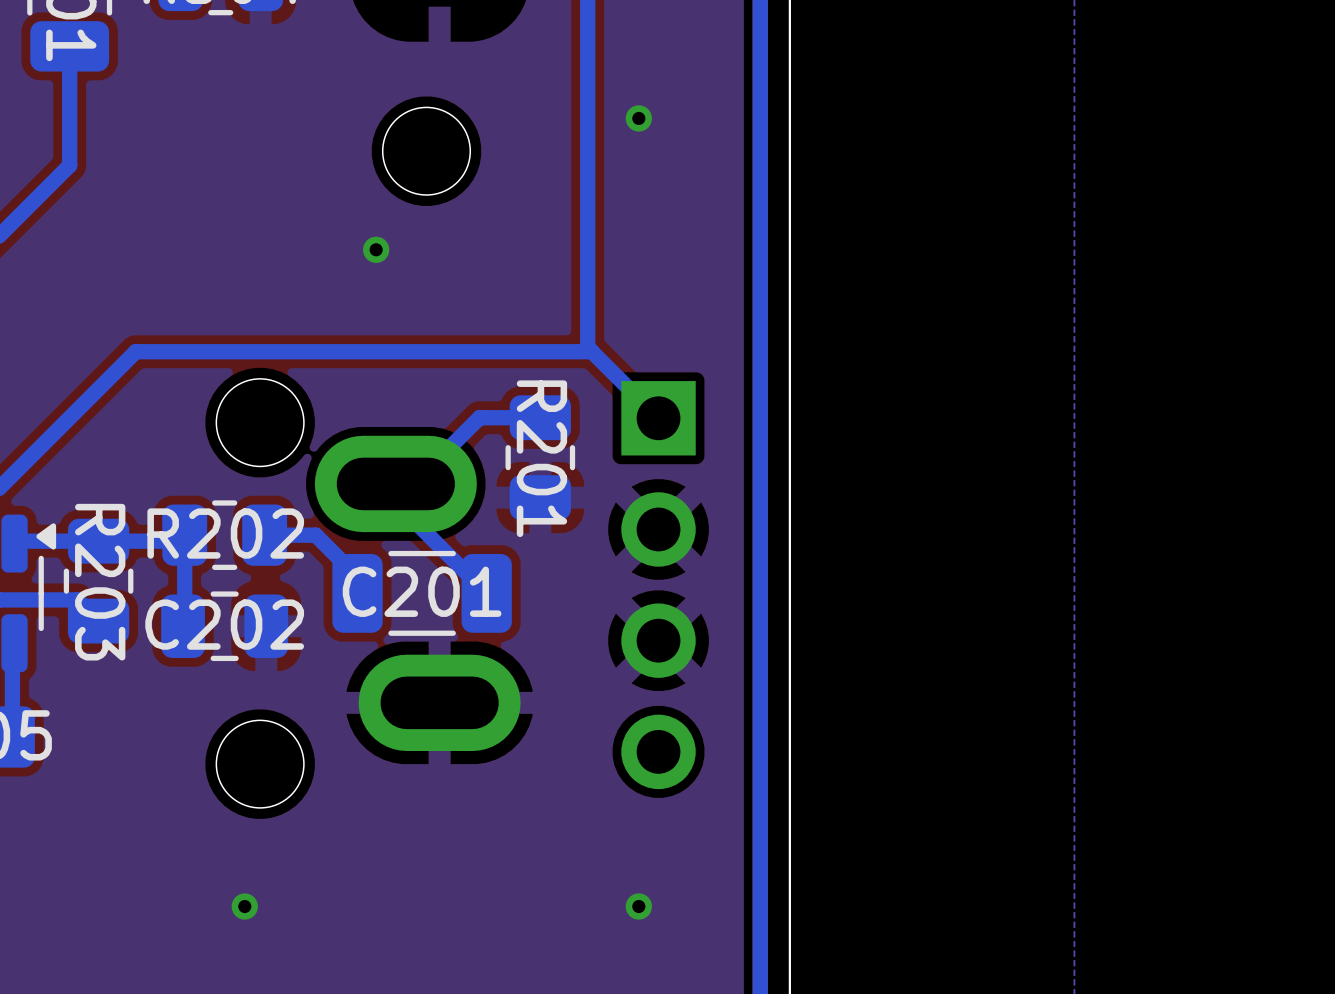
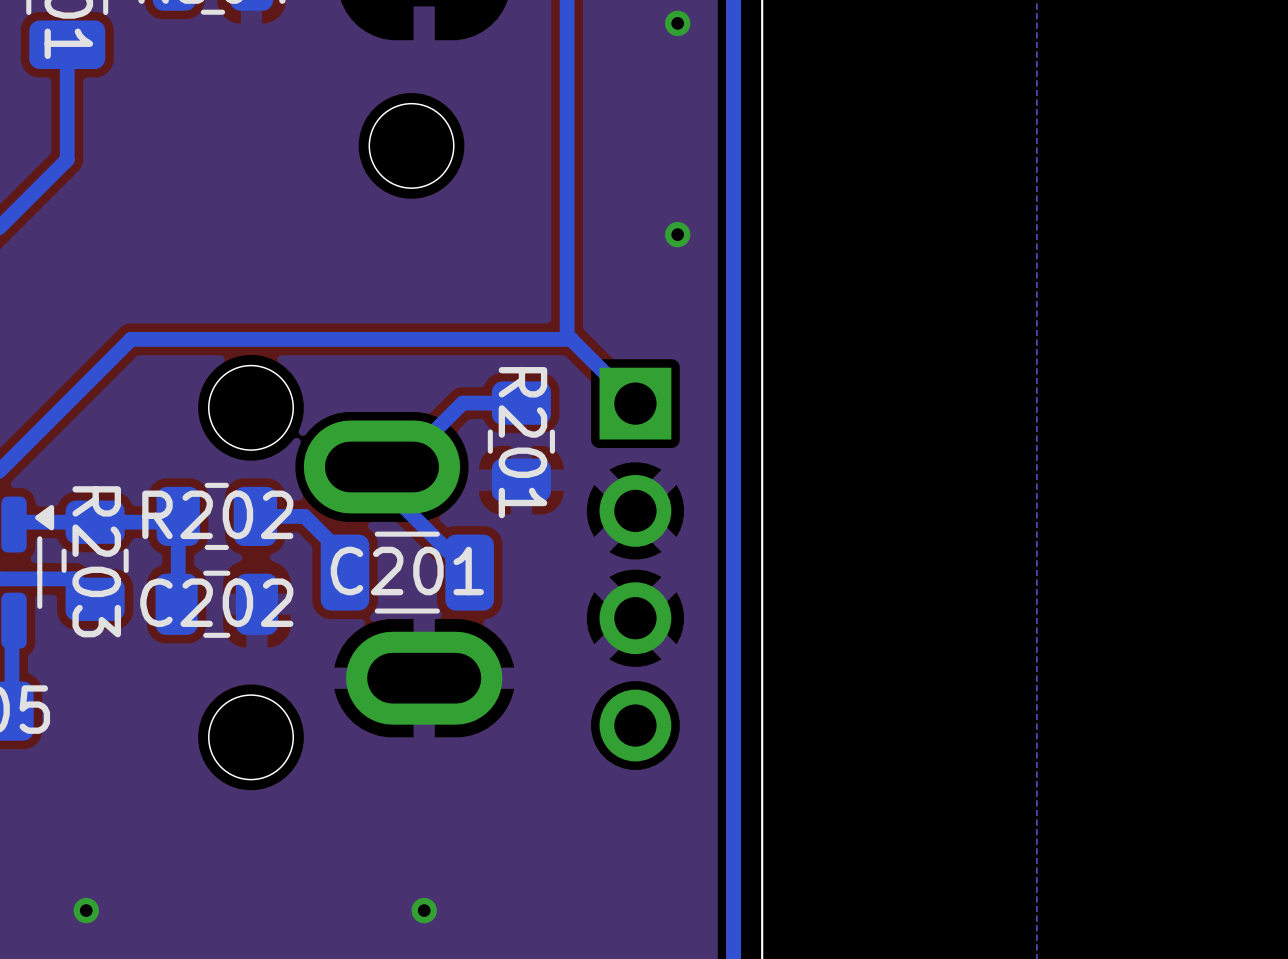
via: none -> (677, 23)
via: (638, 118) -> none
via: none -> (677, 234)
via: (376, 249) -> none
via: (244, 906) -> none
via: (638, 906) -> none
via: none -> (86, 910)
via: none -> (424, 910)

